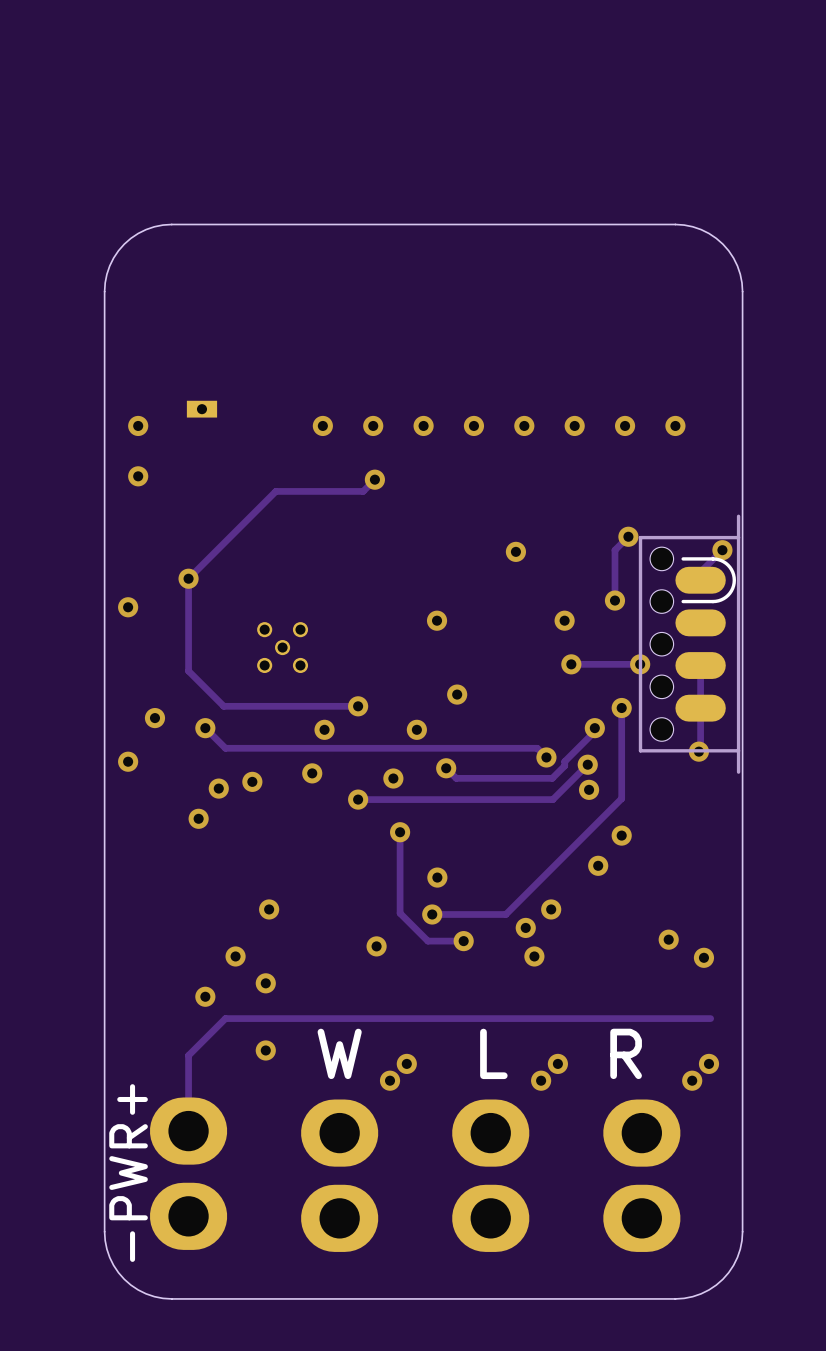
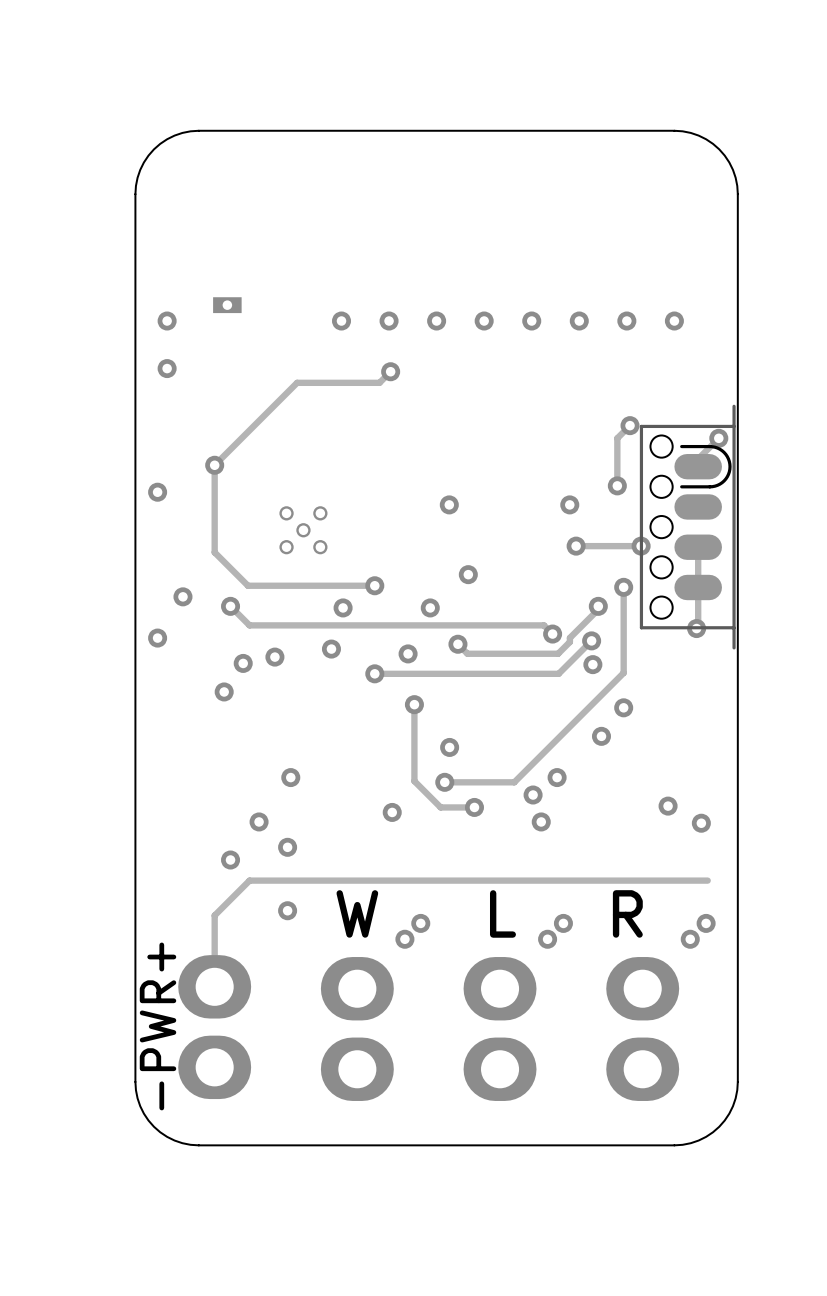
via: (515, 551) -> none

